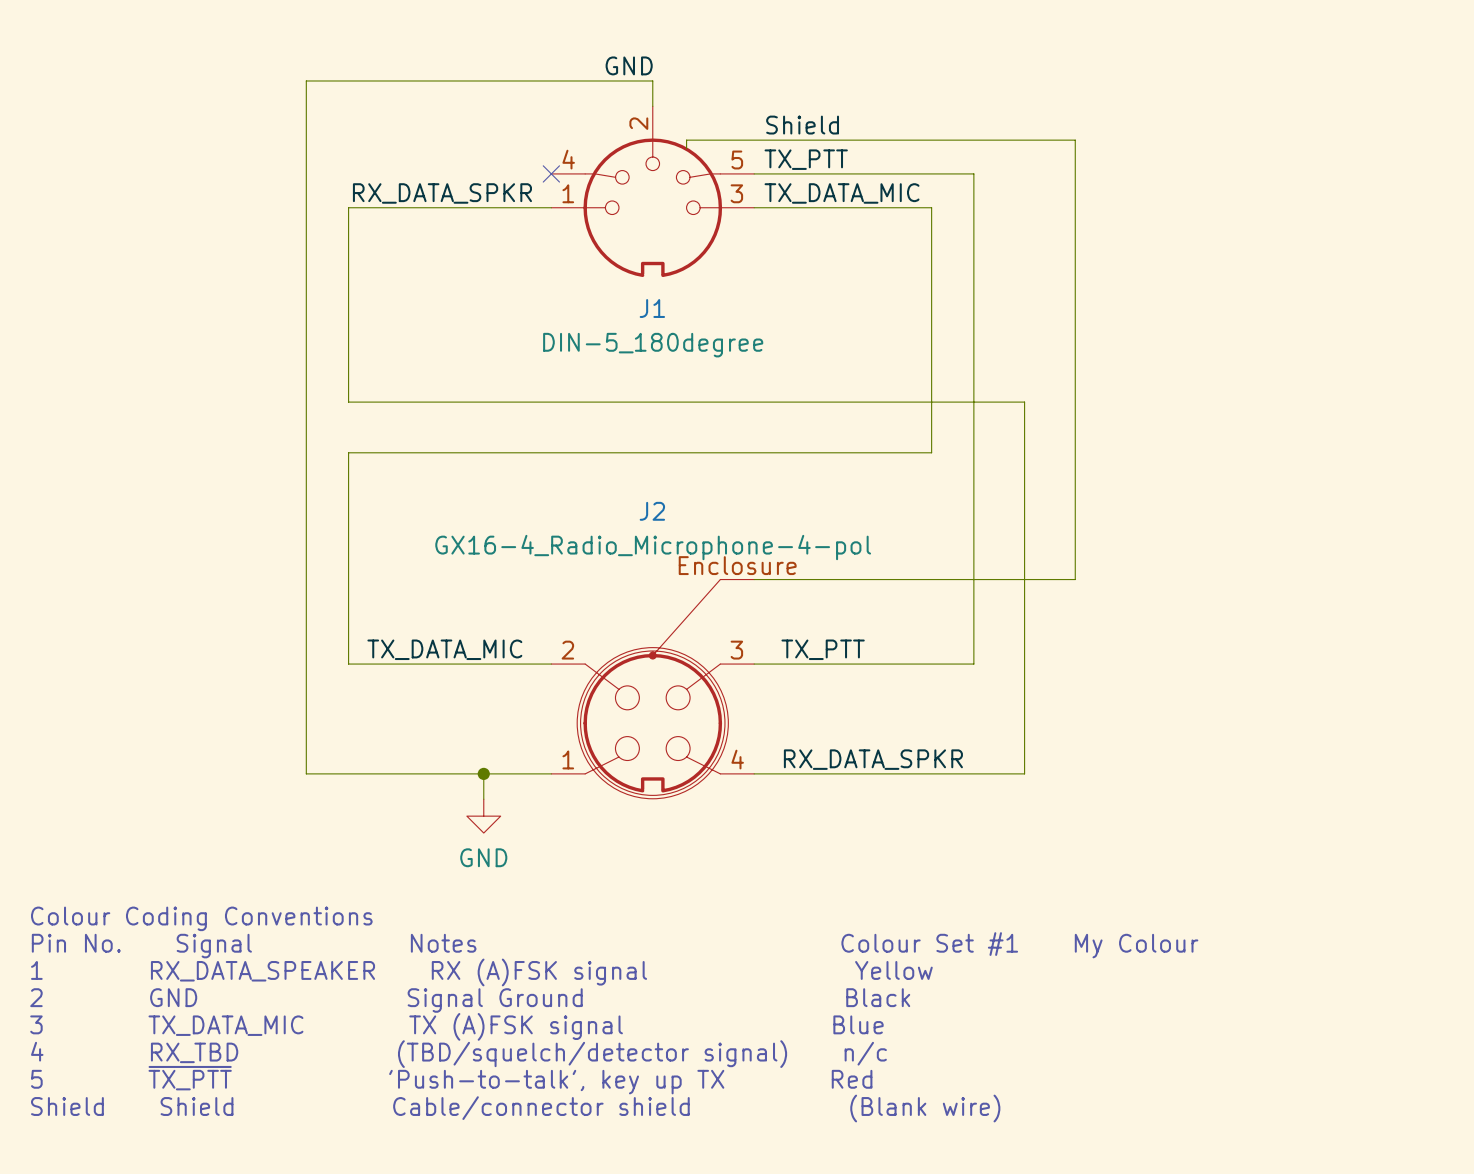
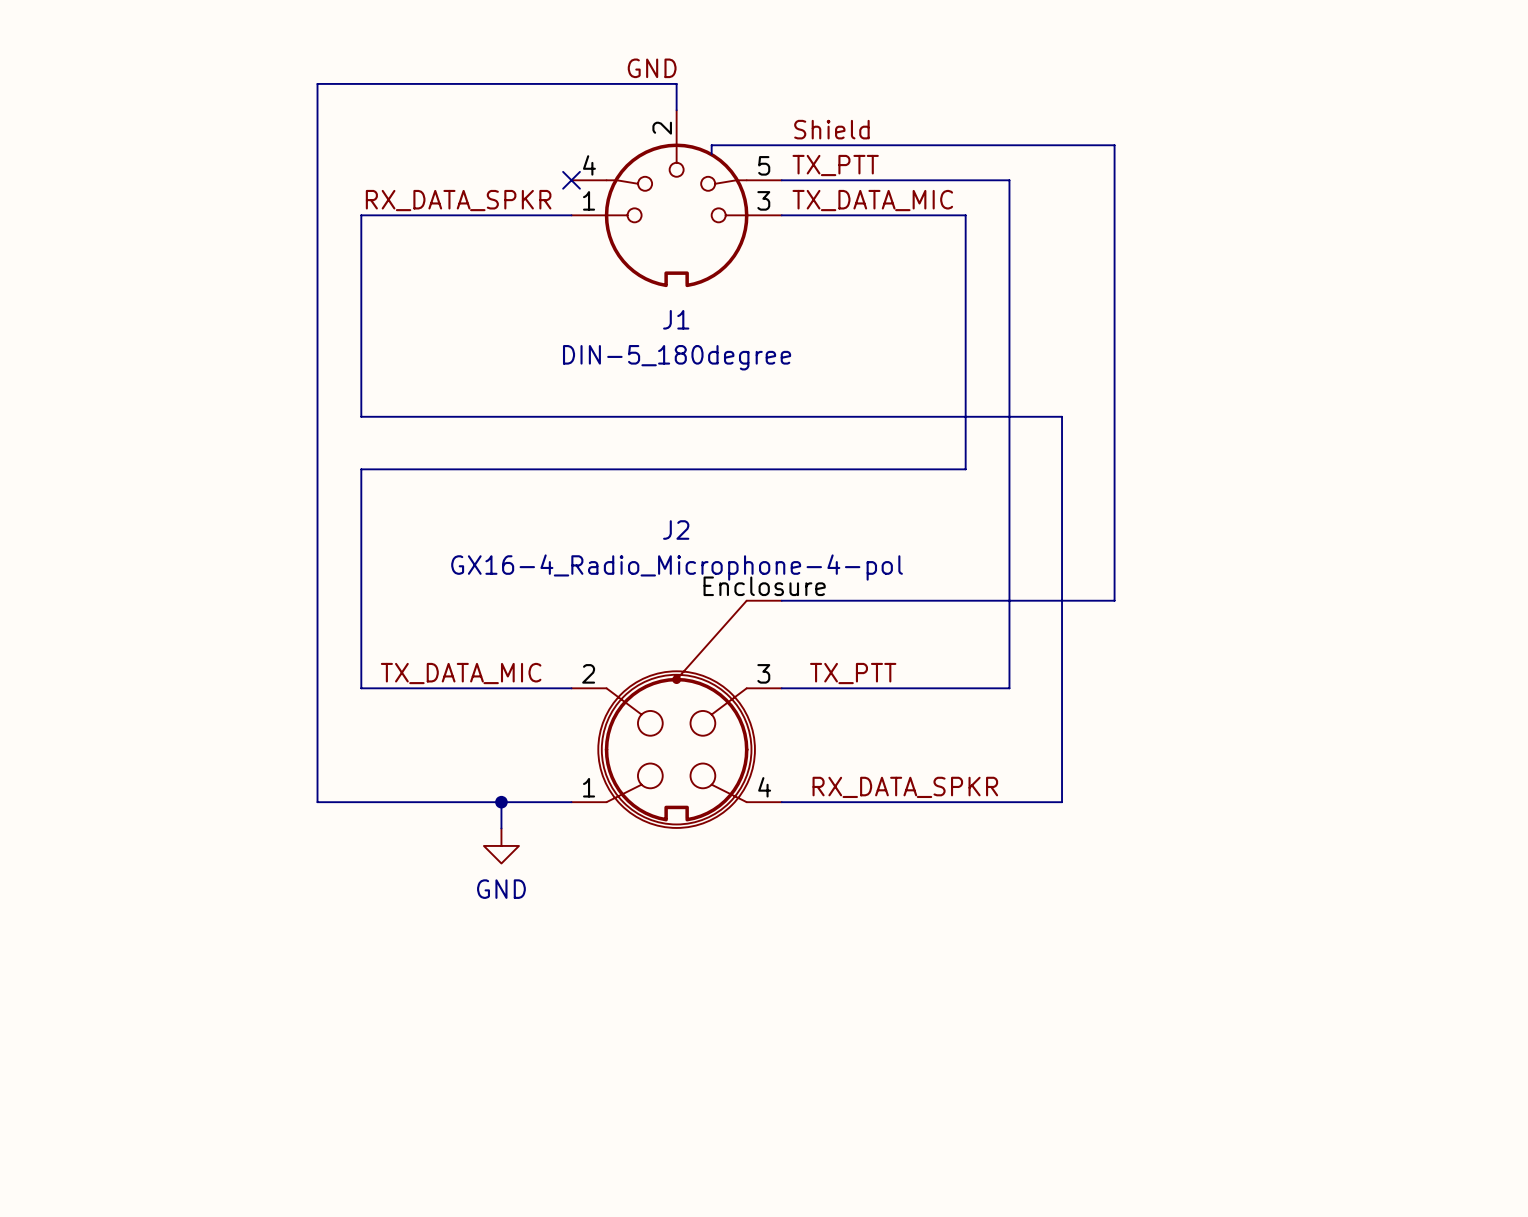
text: Colour Coding Conventions (201, 918) -> none
text: Pin No. Signal Notes Colour Set #1 My Colour (615, 945) -> none
text: 1 RX_DATA_SPEAKER RX (A)FSK signal Yellow (481, 972) -> none
text: 2 GND Signal Ground Black (470, 1000) -> none
text: 3 TX_DATA_MIC TX (A)FSK signal Blue (456, 1026) -> none
text: 4 RX_TBD (TBD/squelch/detector signal) n/c (458, 1054) -> none
text: 5 ~{TX_PTT} 'Push-to-talk', key up TX Red (451, 1080) -> none
text: Shield Shield Cable/connector shield (Blank wire) (515, 1108) -> none

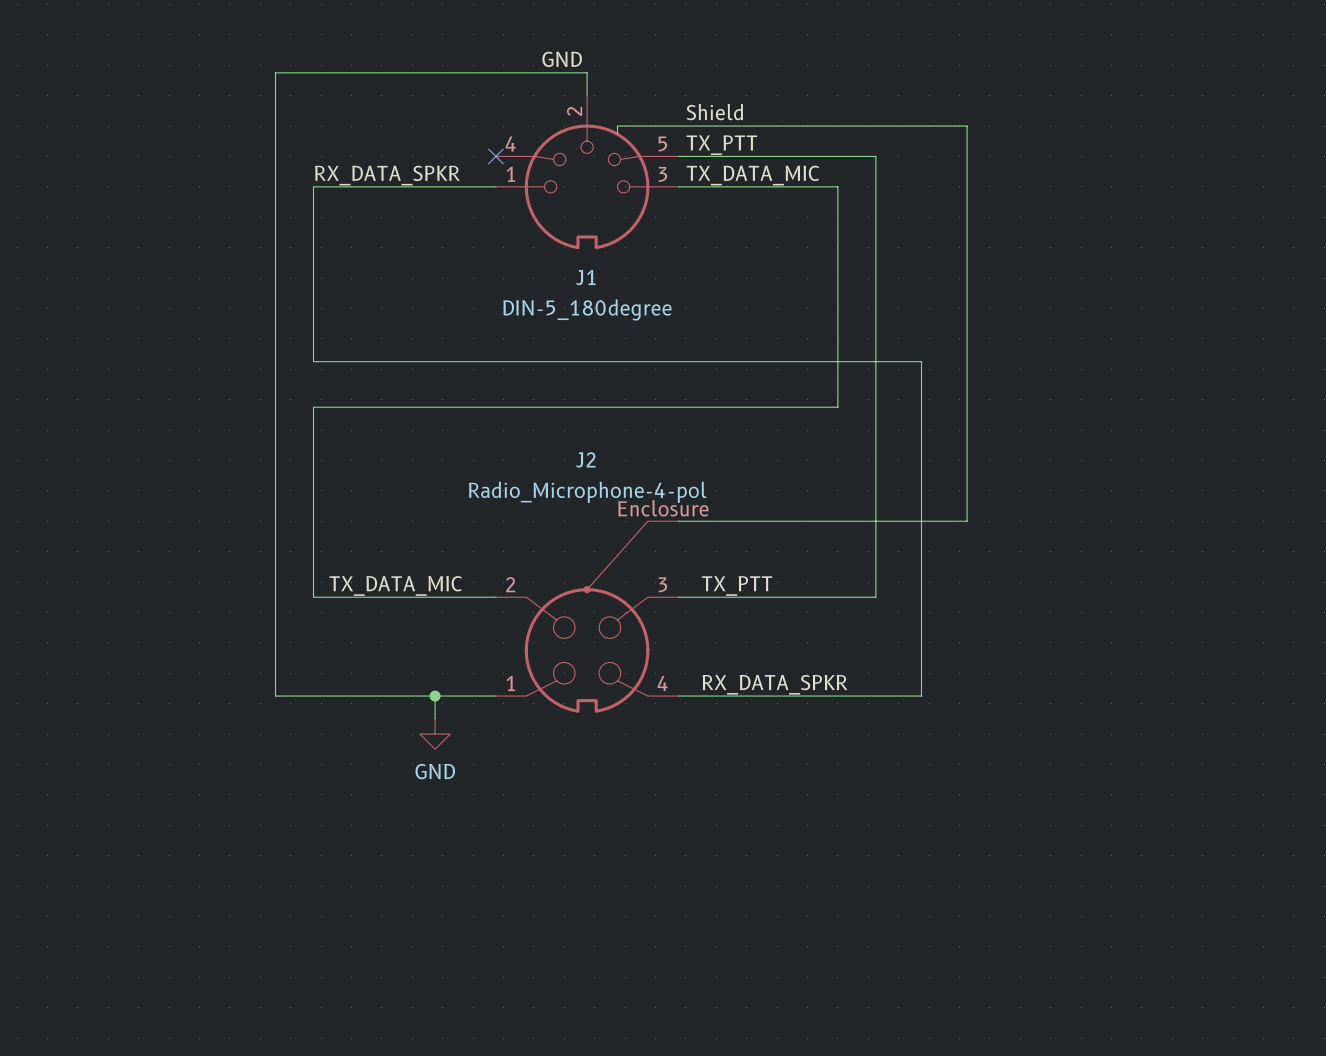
J2 value: GX16-4_Radio_Microphone-4-pol (677, 567) -> Radio_Microphone-4-pol (587, 492)
J2 symbol: [571, 600, 782, 828] -> [495, 521, 679, 713]

